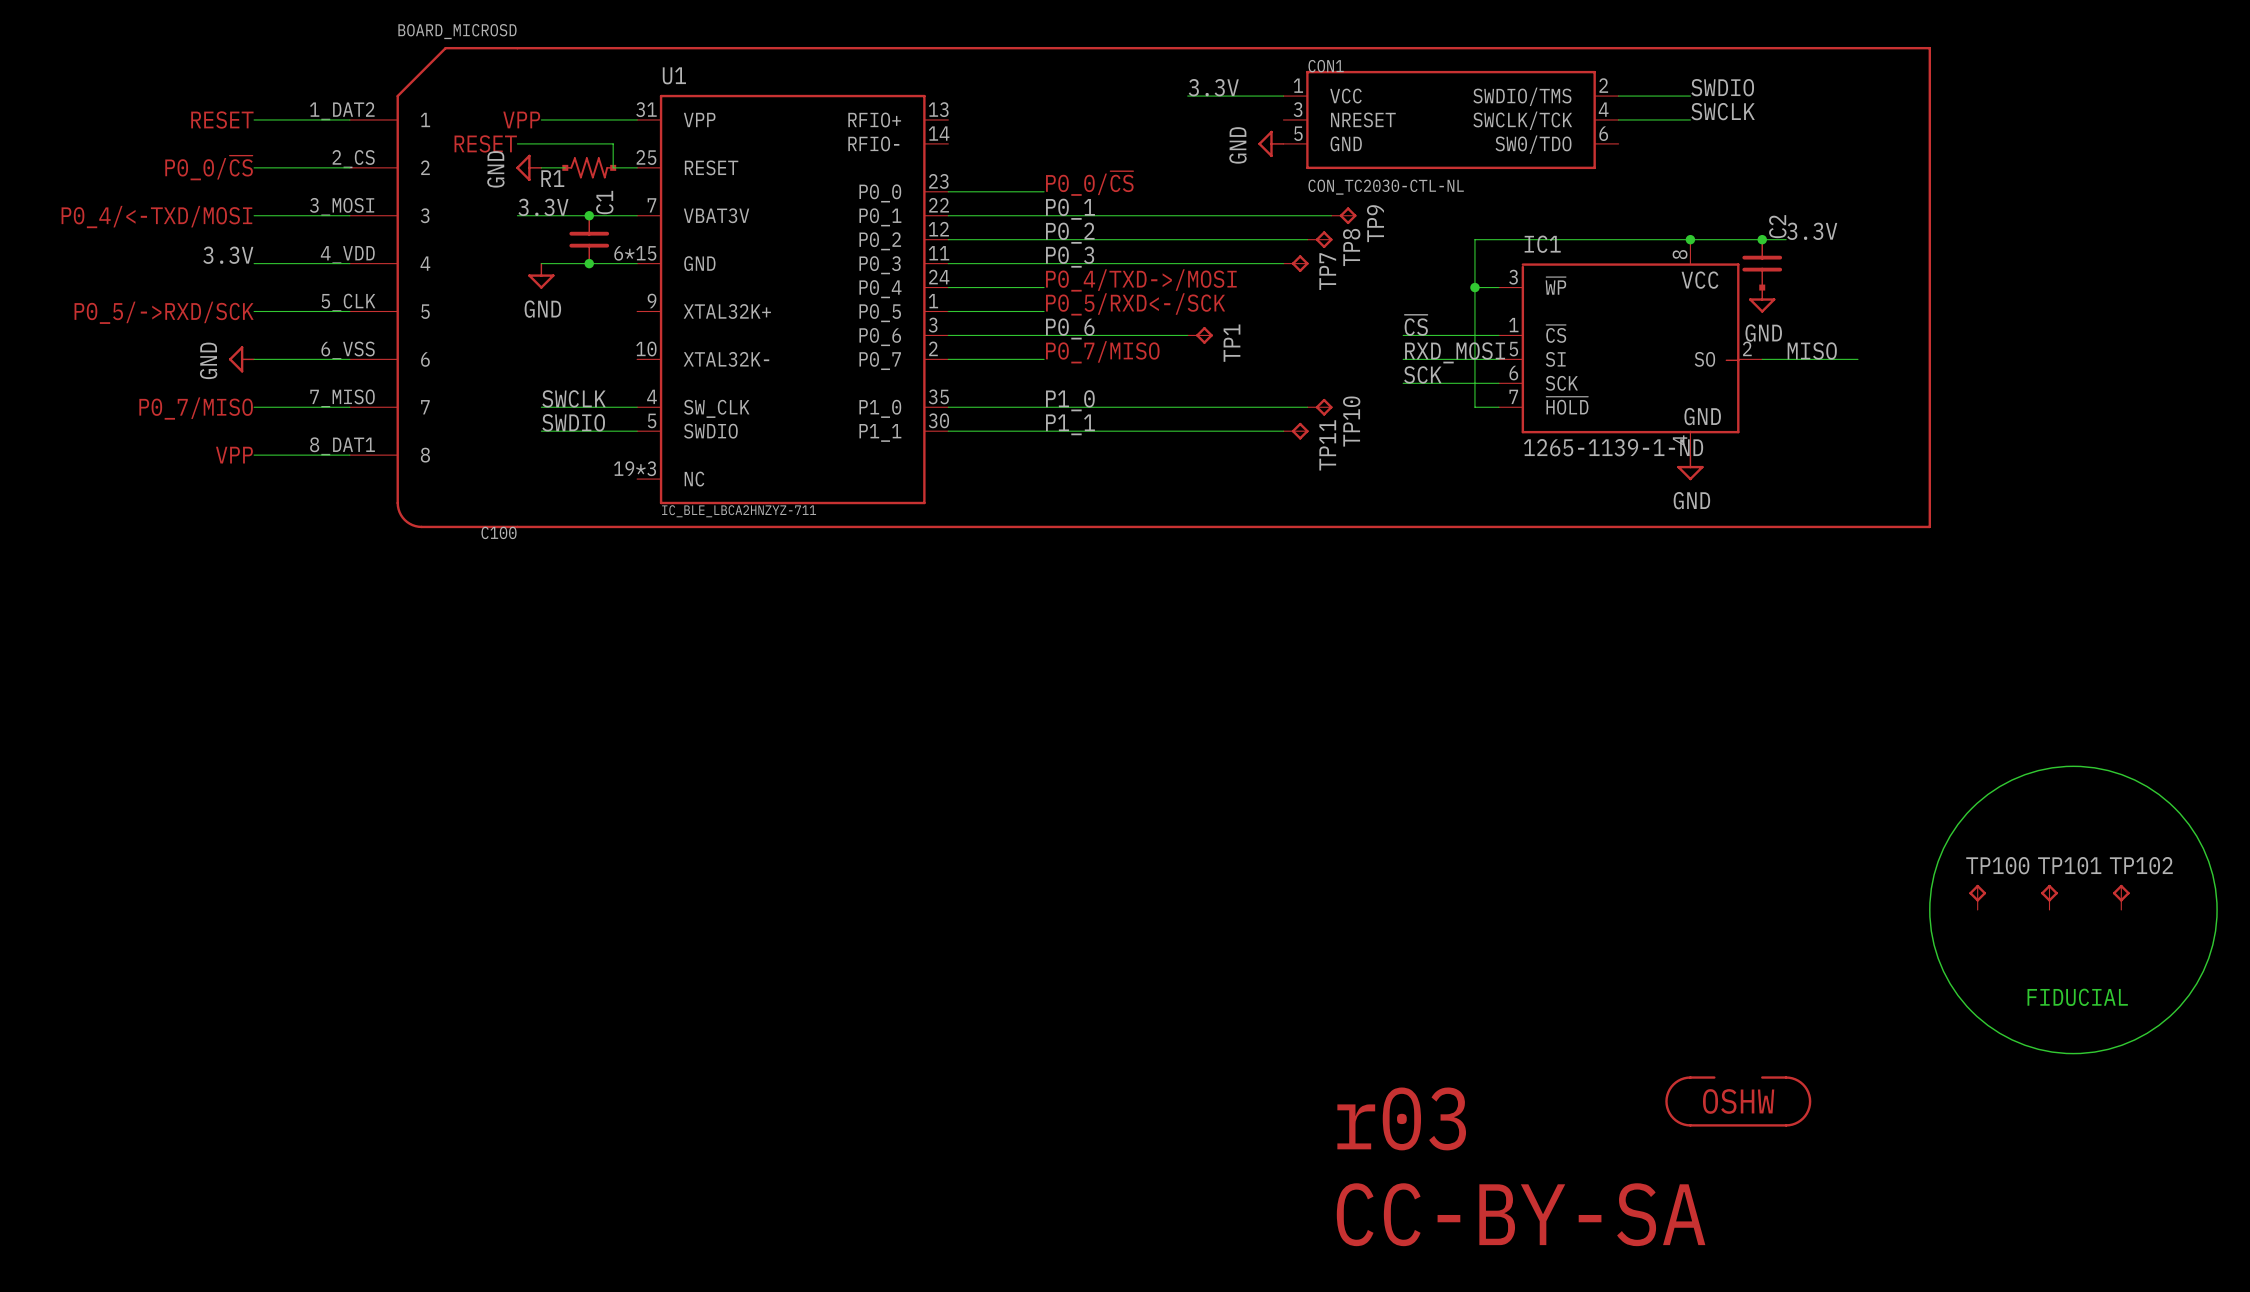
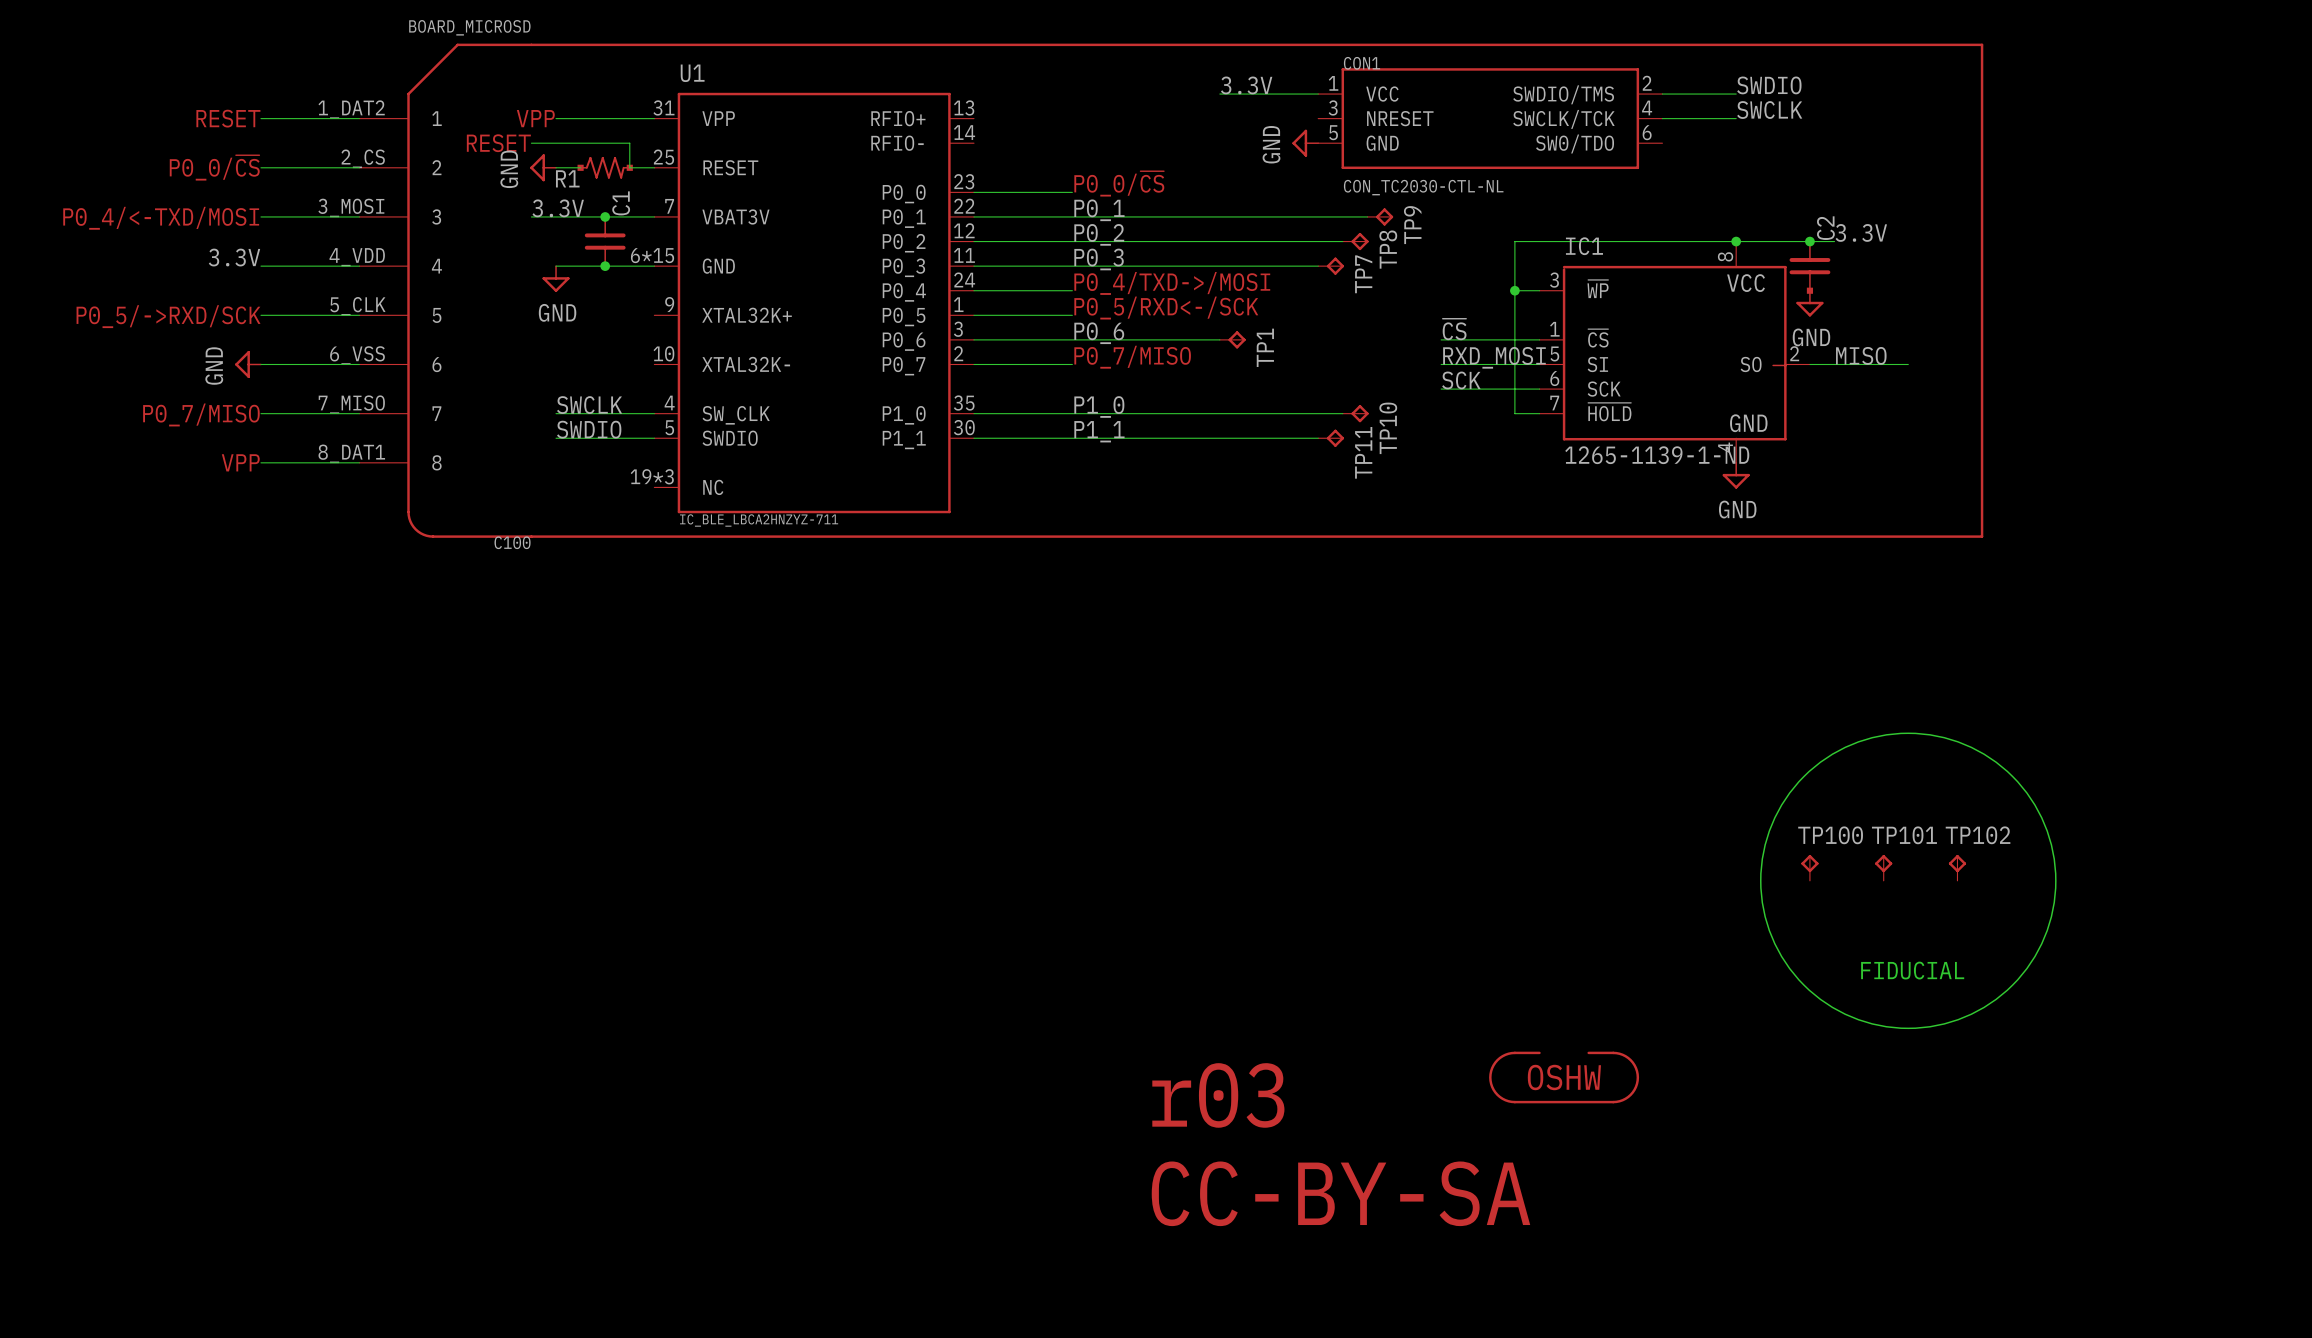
TP100 position: (1977, 897) -> (1809, 867)
TP101 position: (2049, 897) -> (1883, 867)
TP102 position: (2121, 897) -> (1957, 867)
drawing position: (2073, 909) -> (1908, 880)
text position: FIDUCIAL (2077, 997) -> FIDUCIAL (1912, 970)
part position: (1738, 1101) -> (1564, 1077)
text position: r03 (1401, 1118) -> r03 (1218, 1095)
text position: CC-BY-SA (1521, 1214) -> CC-BY-SA (1340, 1193)

